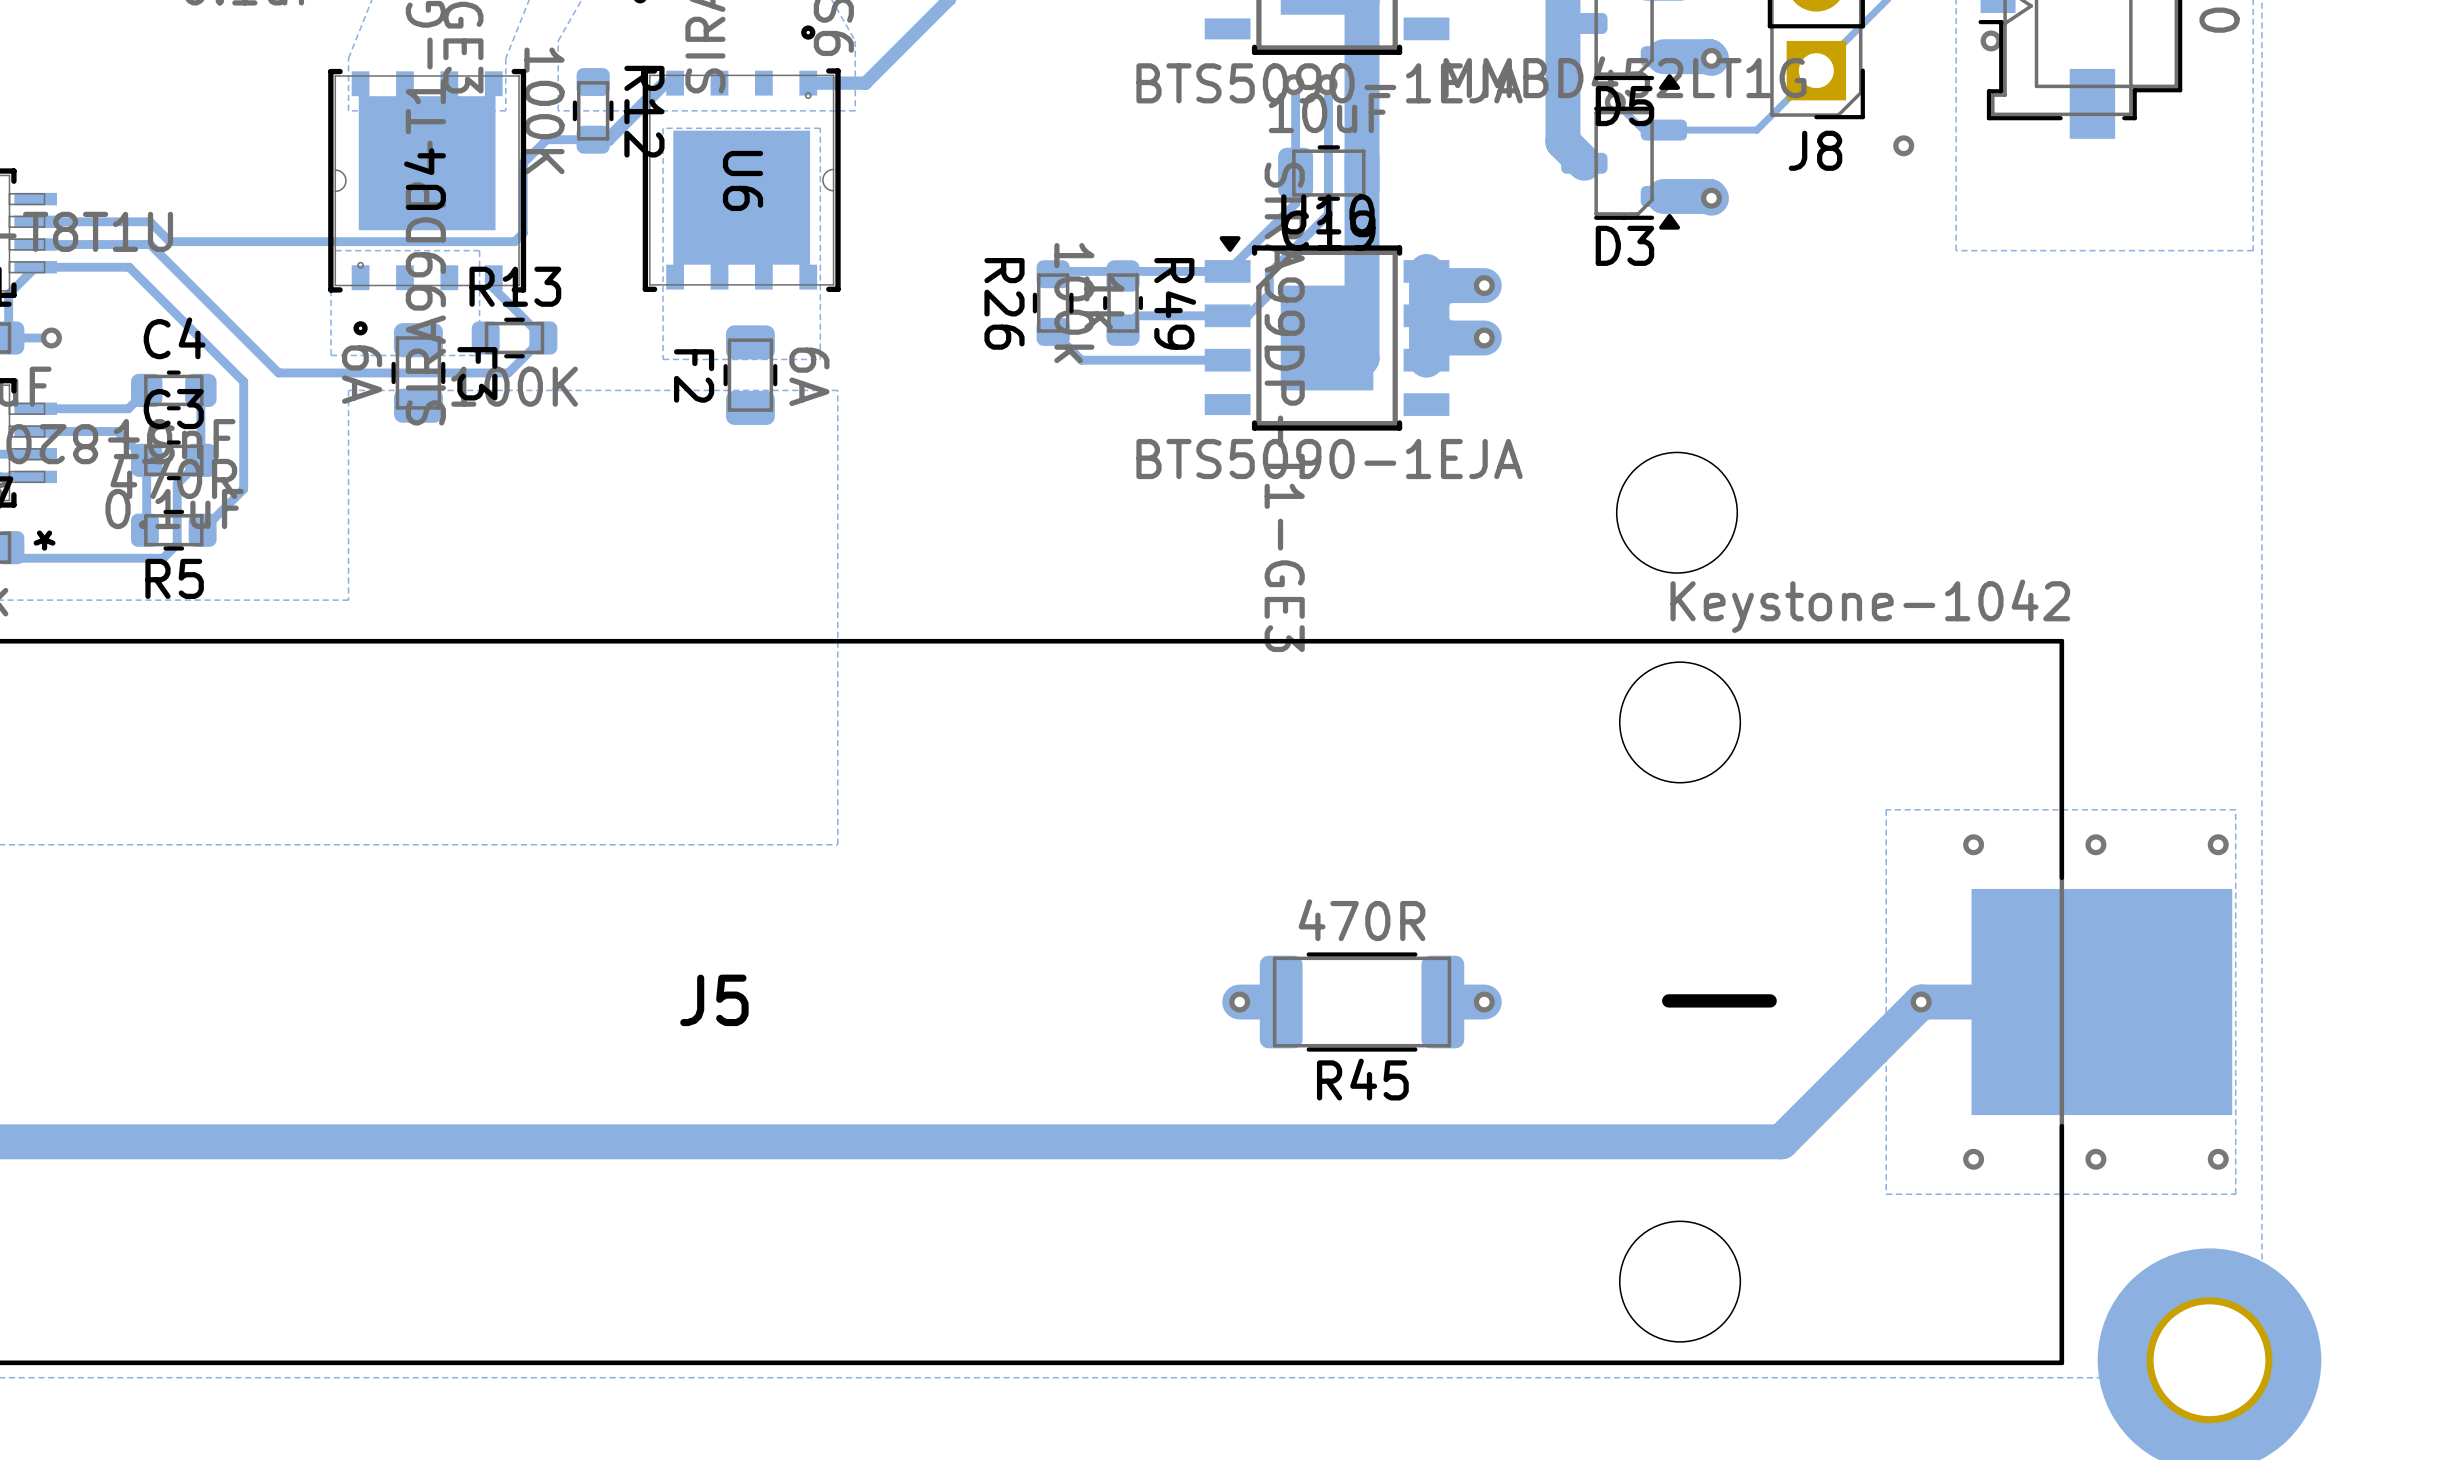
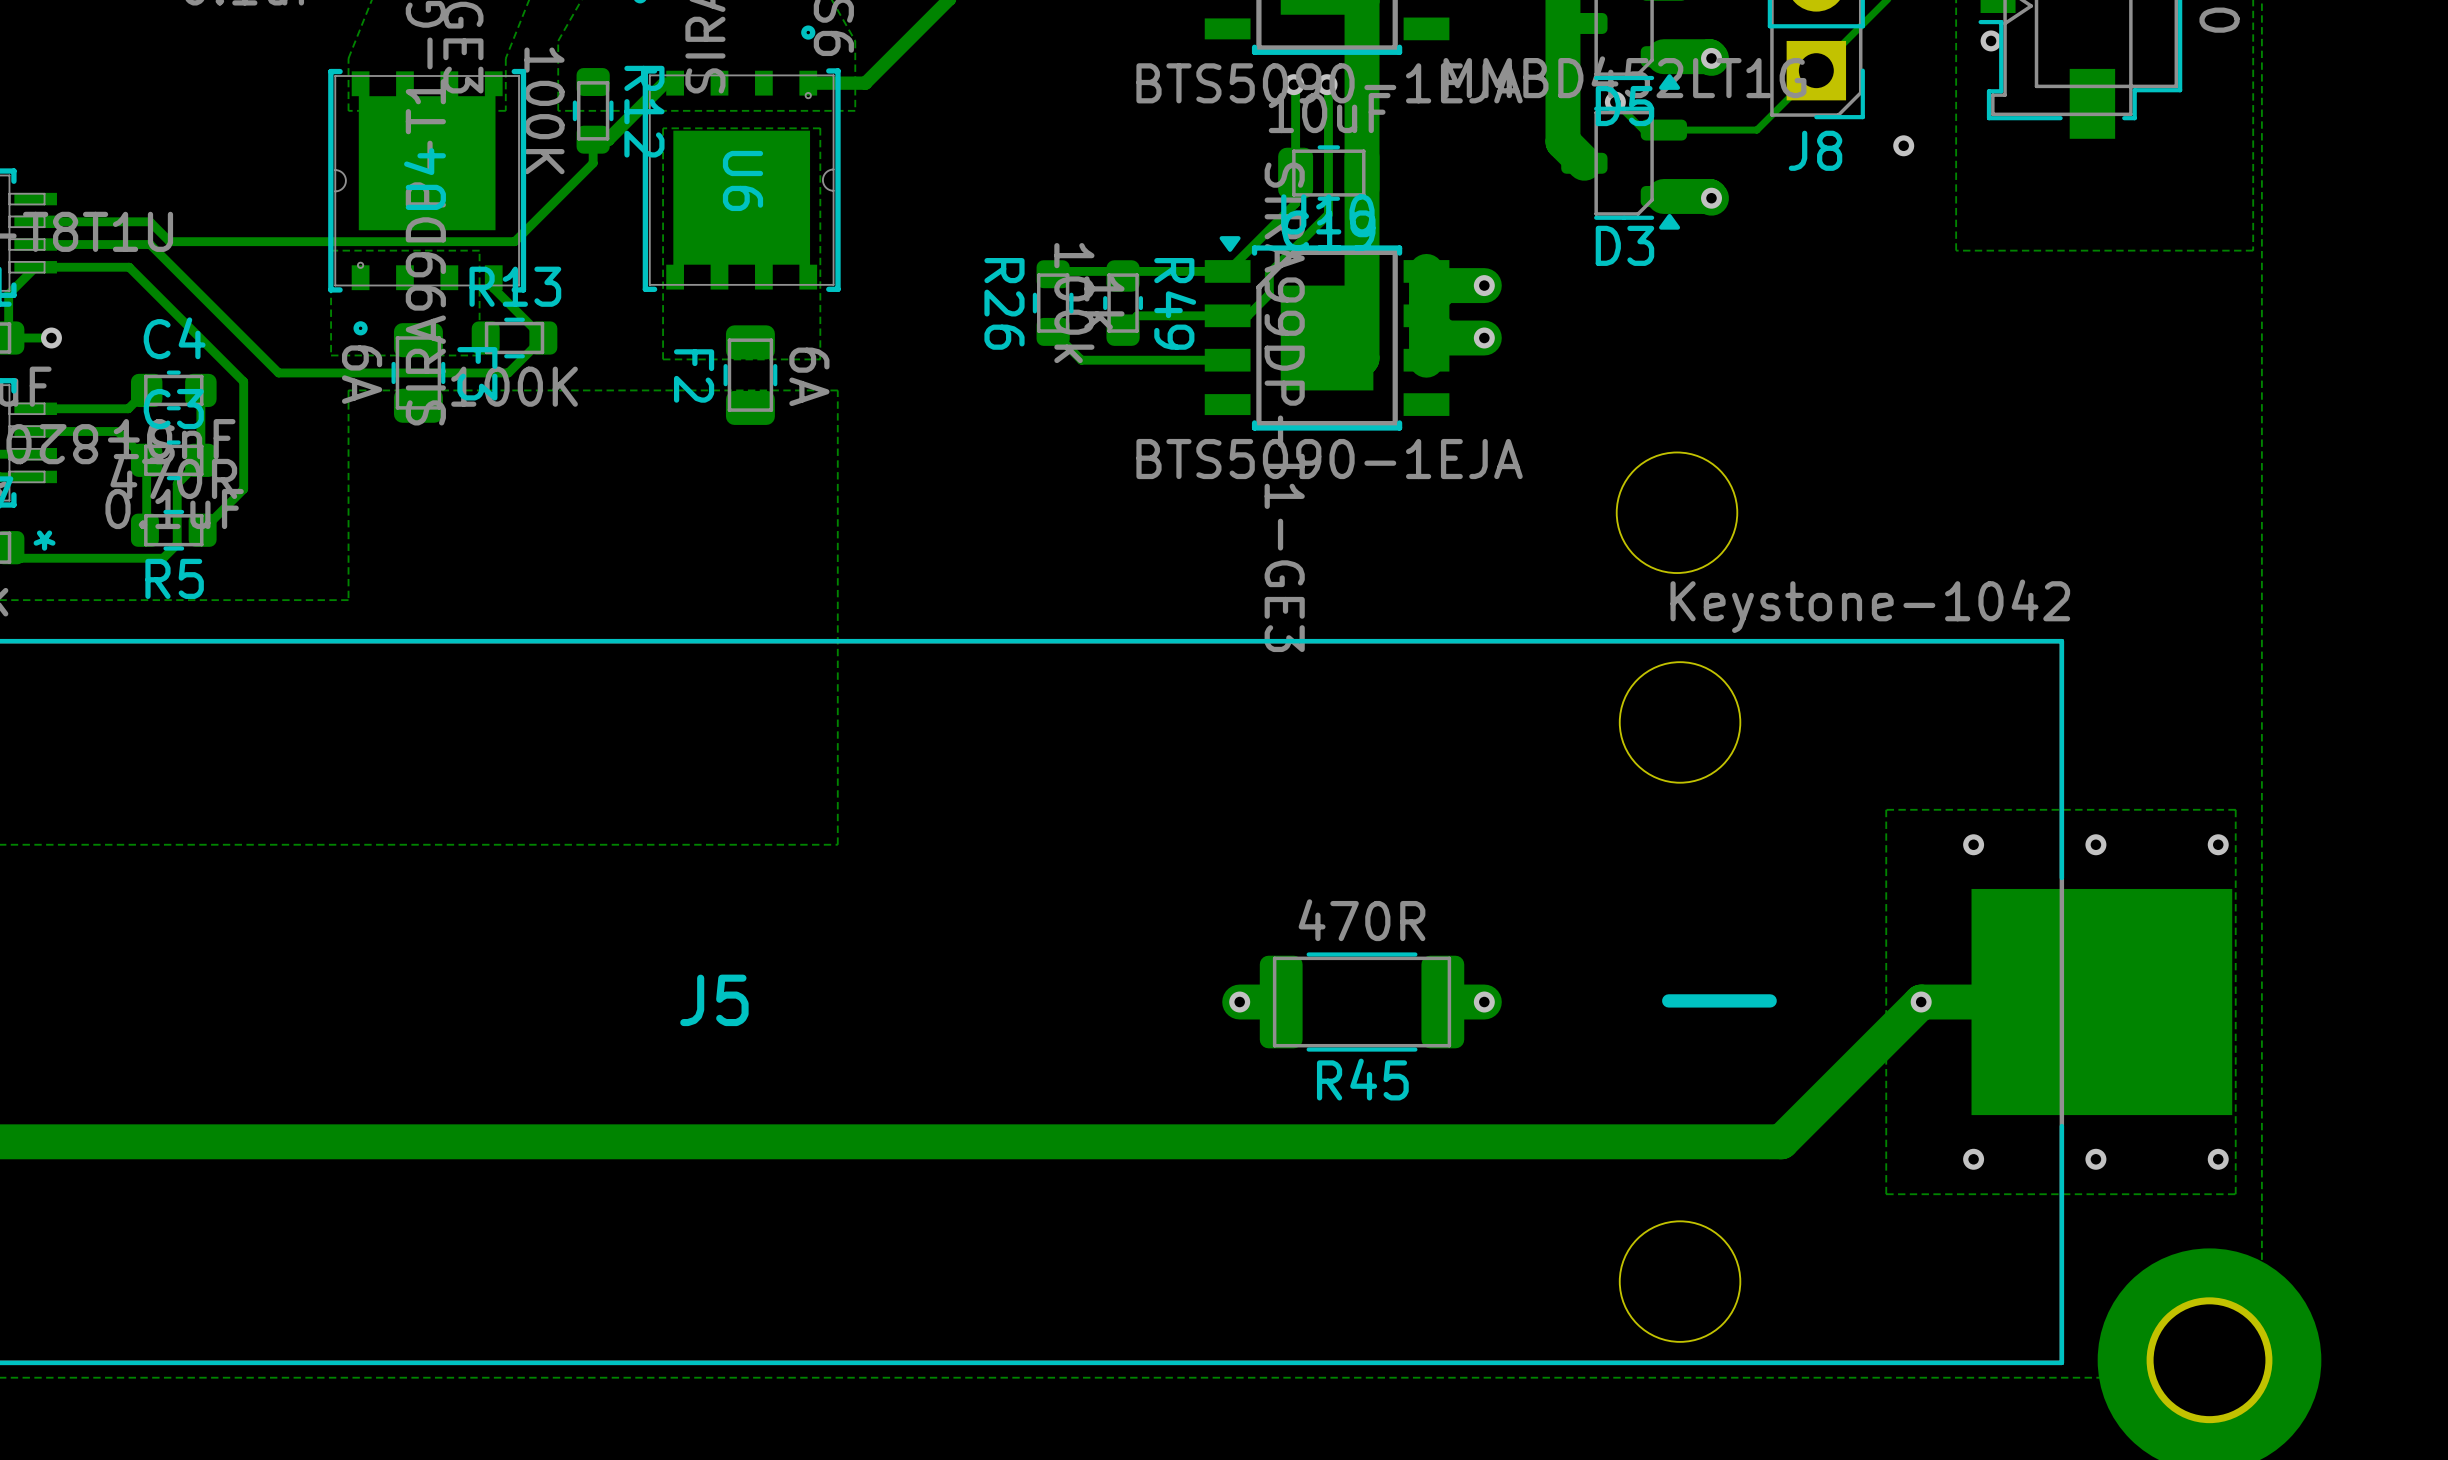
track: (593, 139) (546, 139) (523, 163) (523, 233) -> (593, 139) (593, 163) (523, 233)

